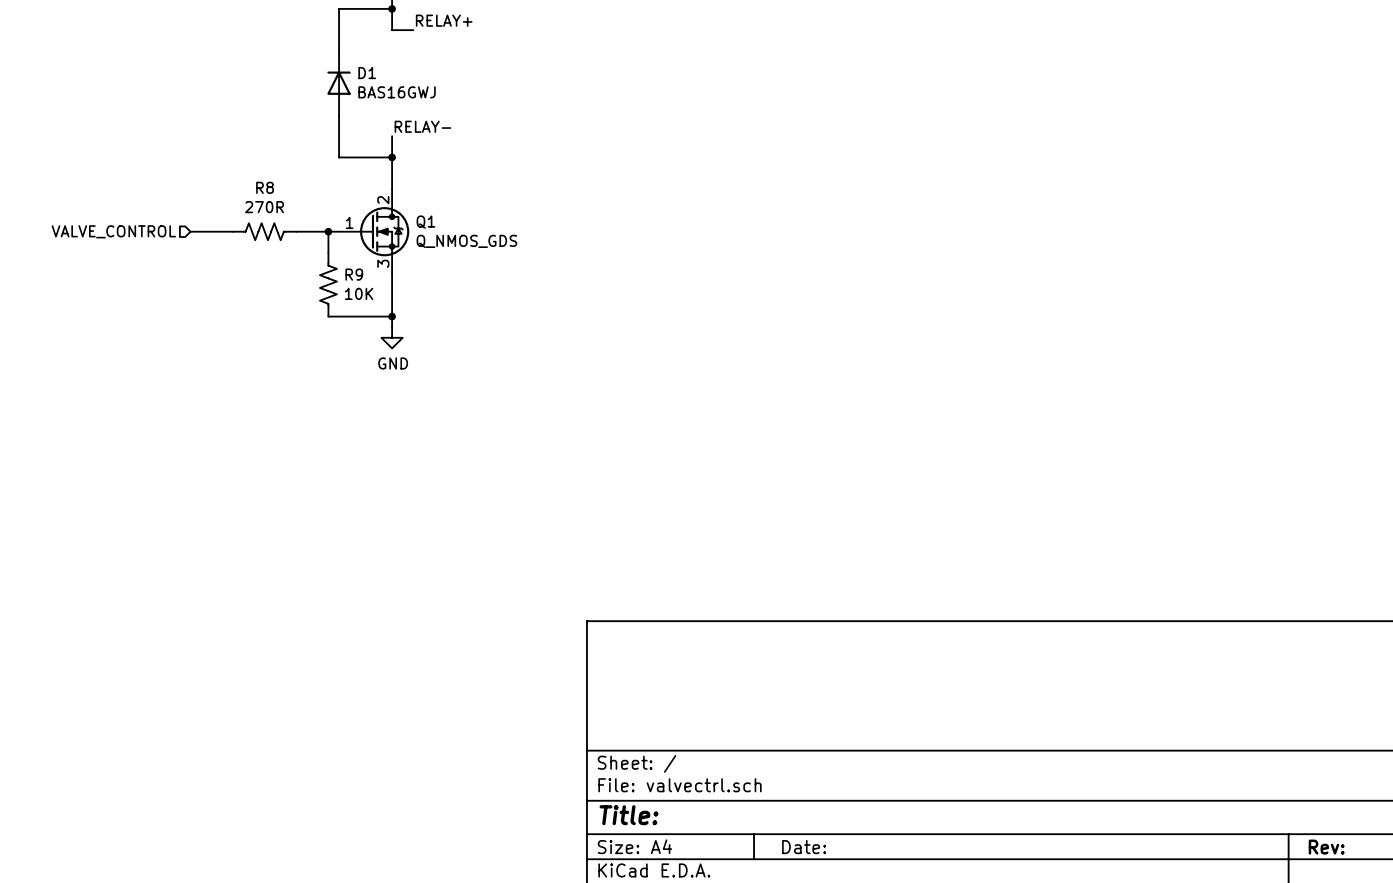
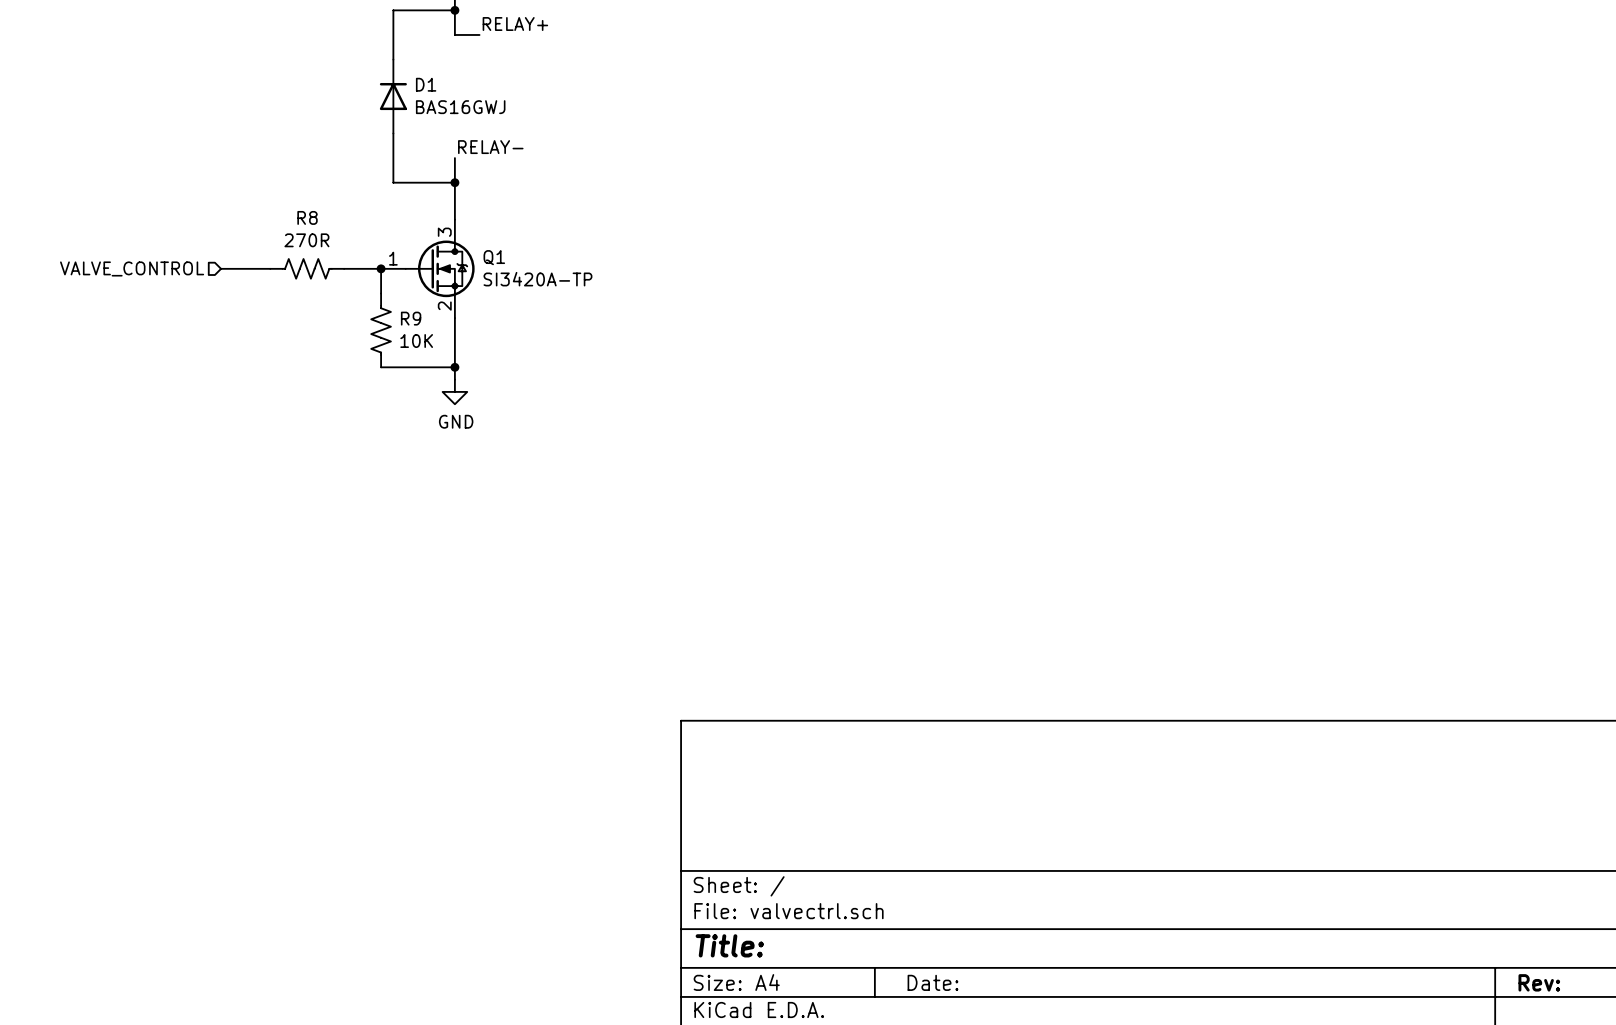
Q1 symbol: [328, 189, 410, 275] -> [381, 219, 475, 319]
Q1 value: Q_NMOS_GDS (466, 241) -> SI3420A-TP (537, 279)

